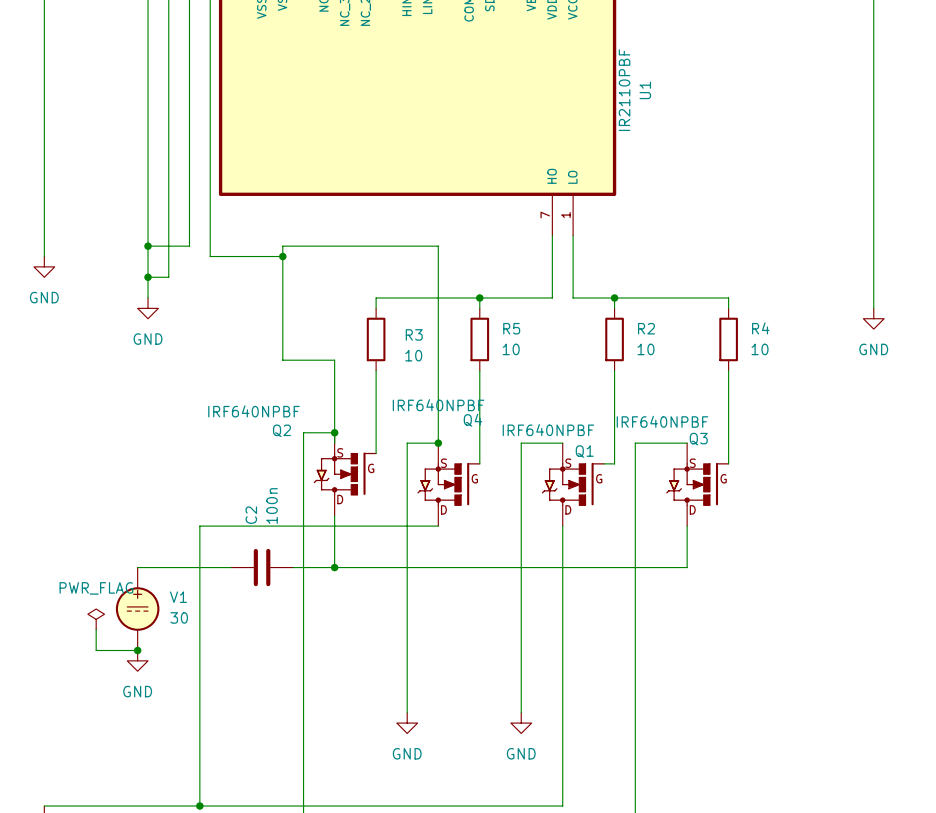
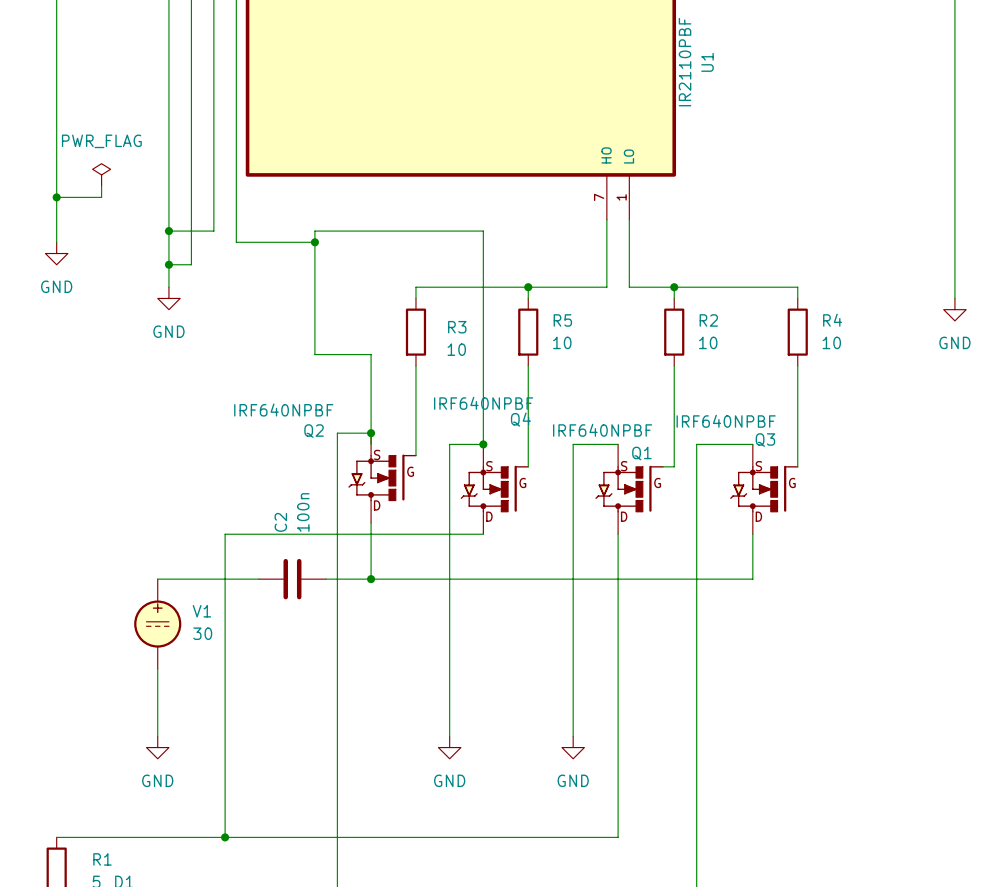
power symbol: none -> PWR_FLAG (101, 174)
wire: none -> (101, 186) (101, 197) (56, 197)
junction: none -> (56, 197)
power symbol: PWR_FLAG (96, 619) -> none
wire: (96, 629) (96, 650) (137, 650) -> (157, 736) (157, 668)
junction: (137, 650) -> none
power symbol position: GND (137, 660) -> GND (157, 747)

